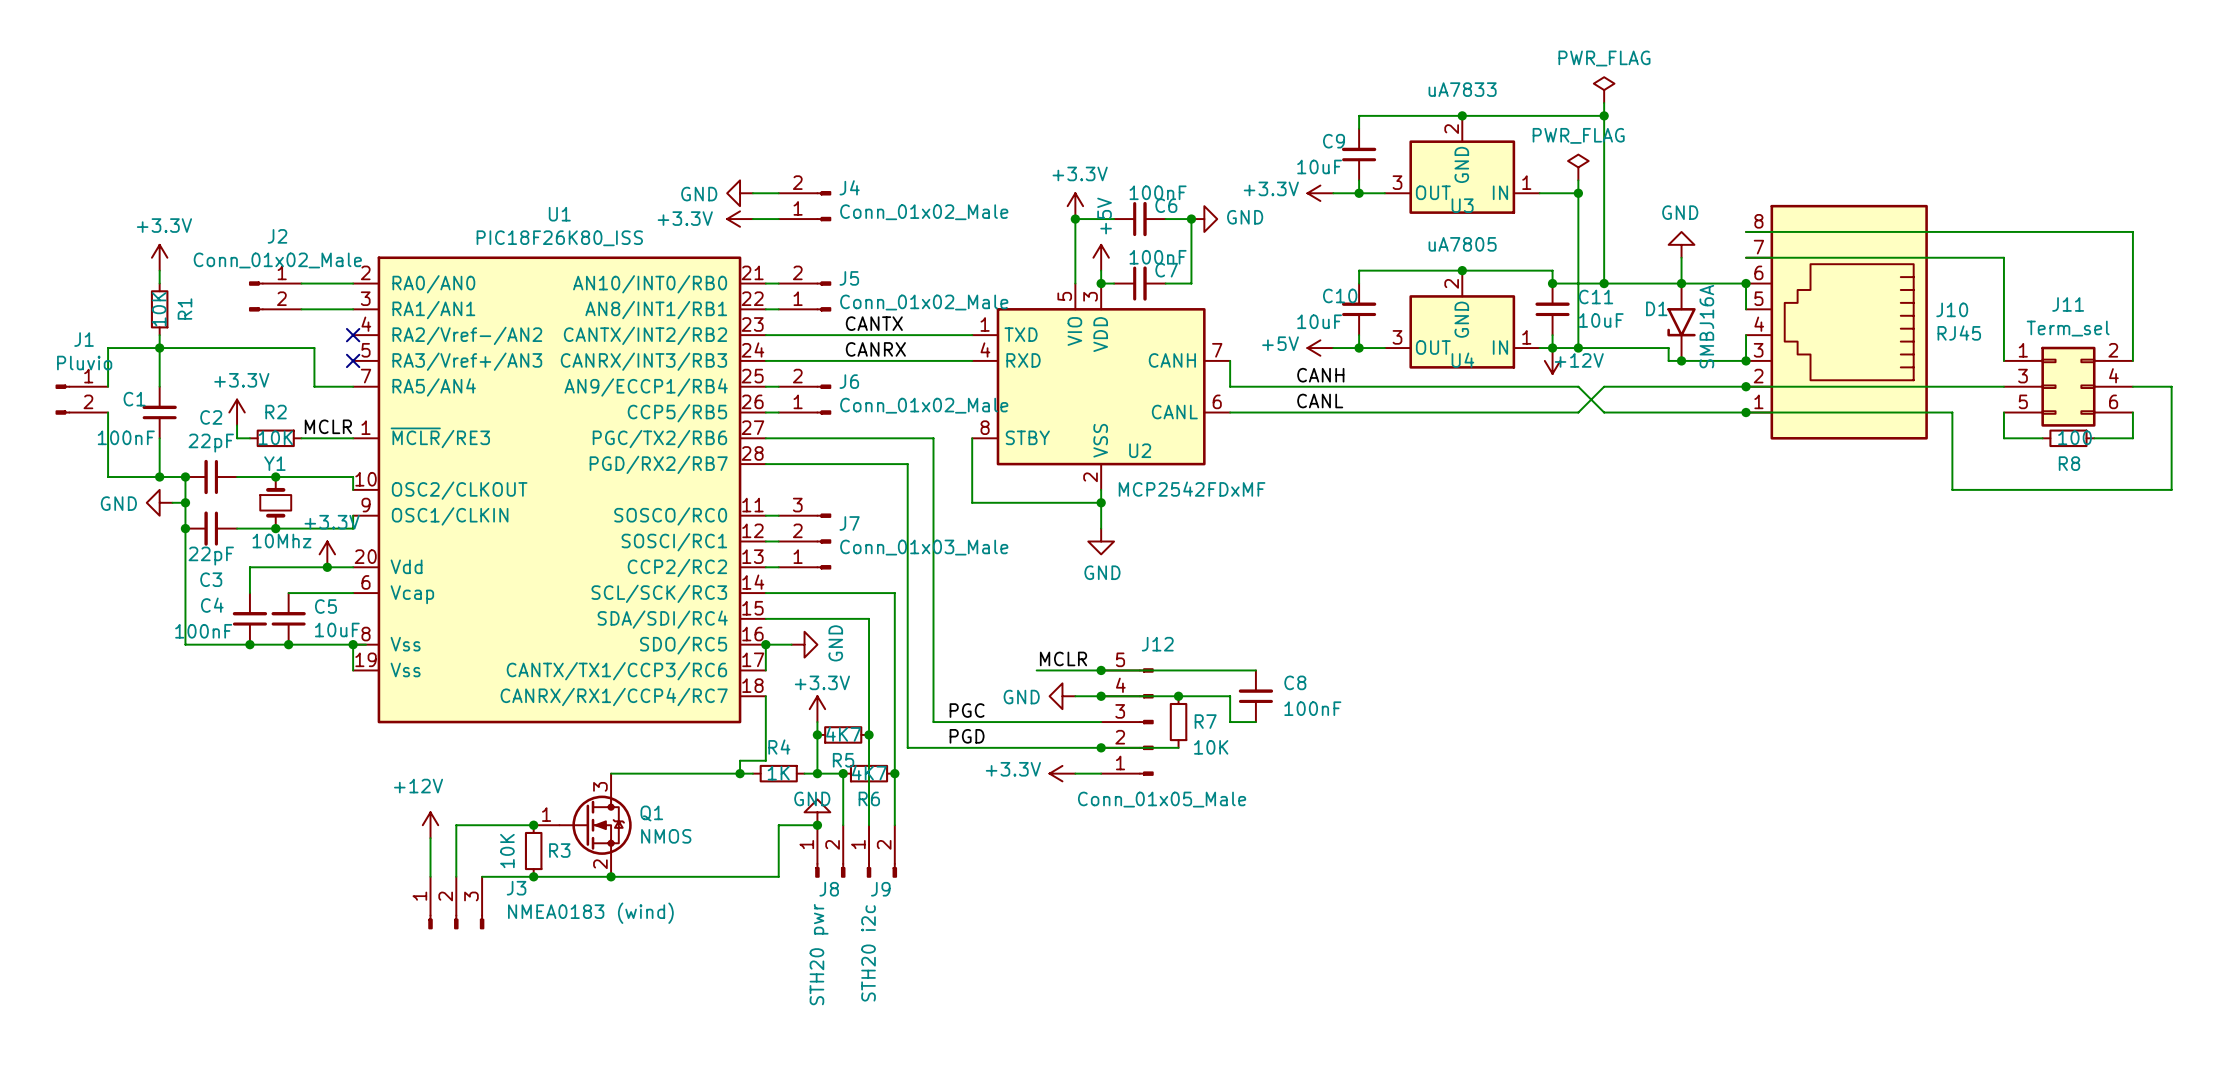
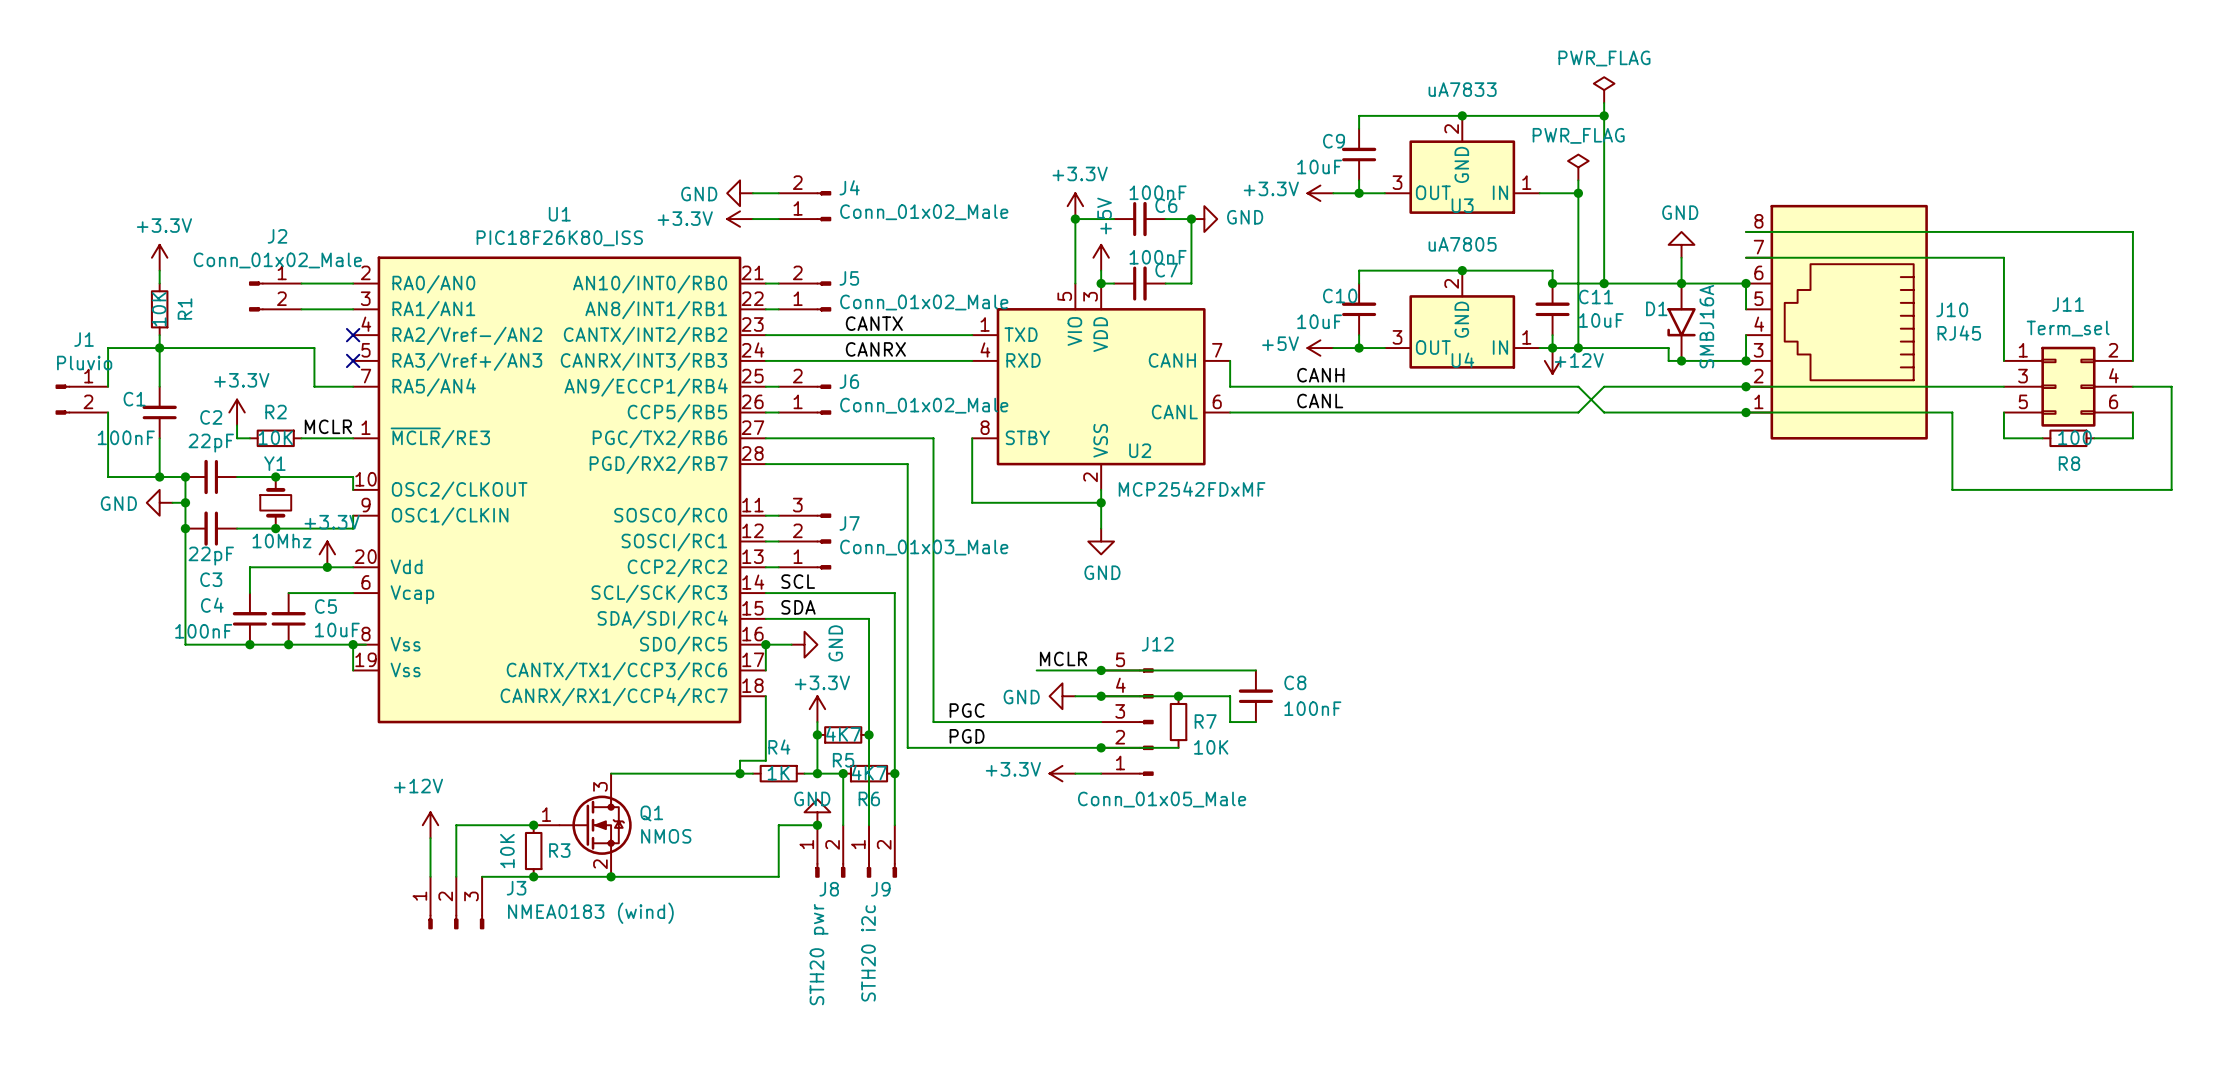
label: none -> SCL (798, 581)
label: none -> SDA (798, 607)

